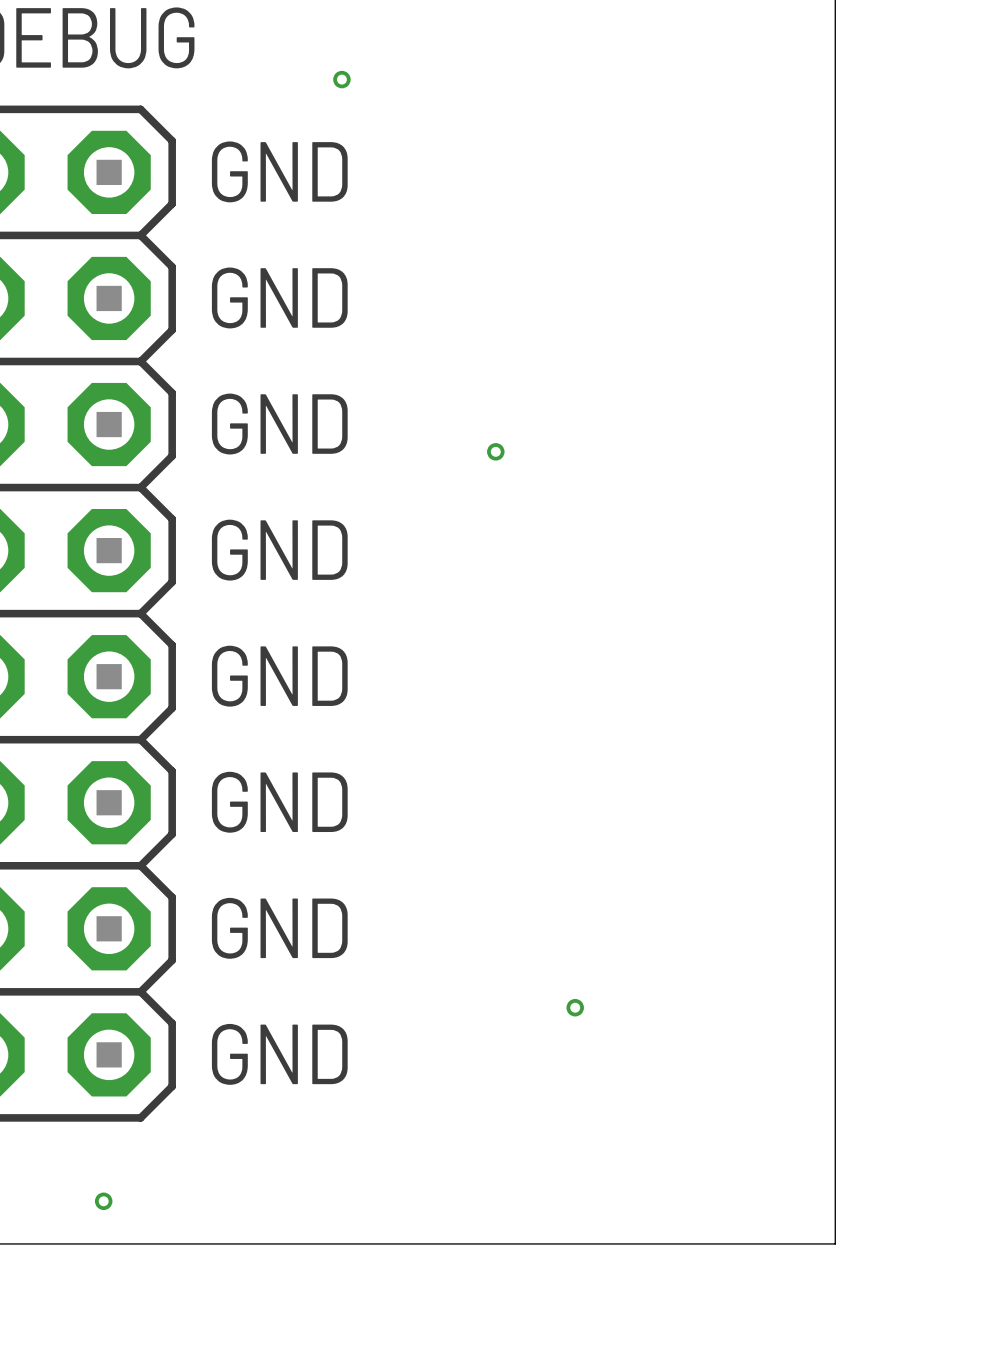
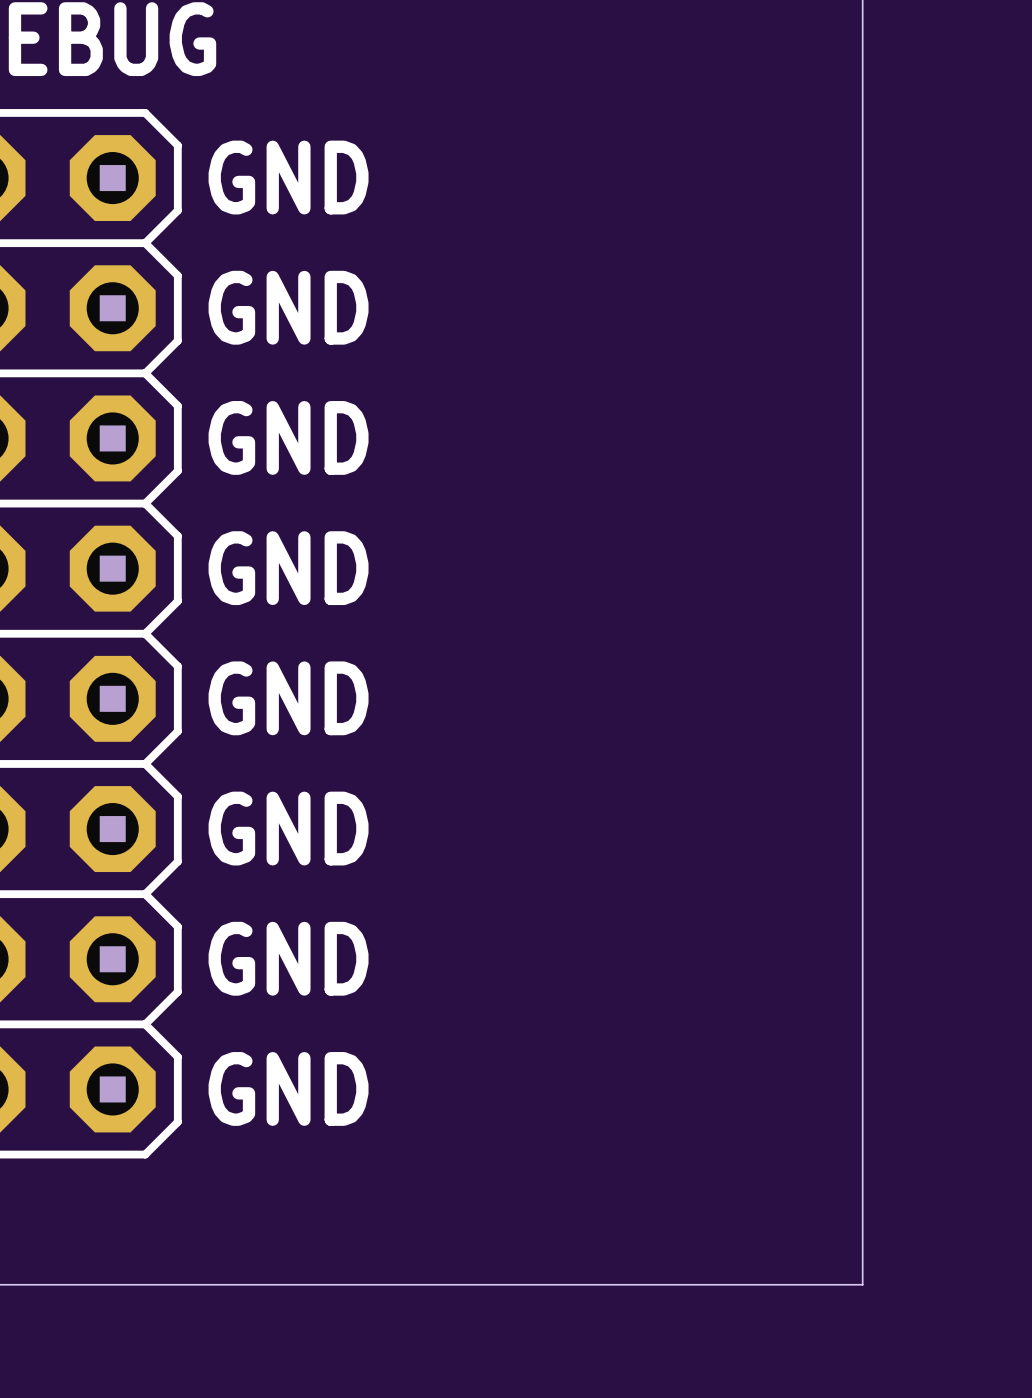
via: (341, 79) -> none
via: (495, 451) -> none
via: (575, 1007) -> none
via: (103, 1201) -> none

